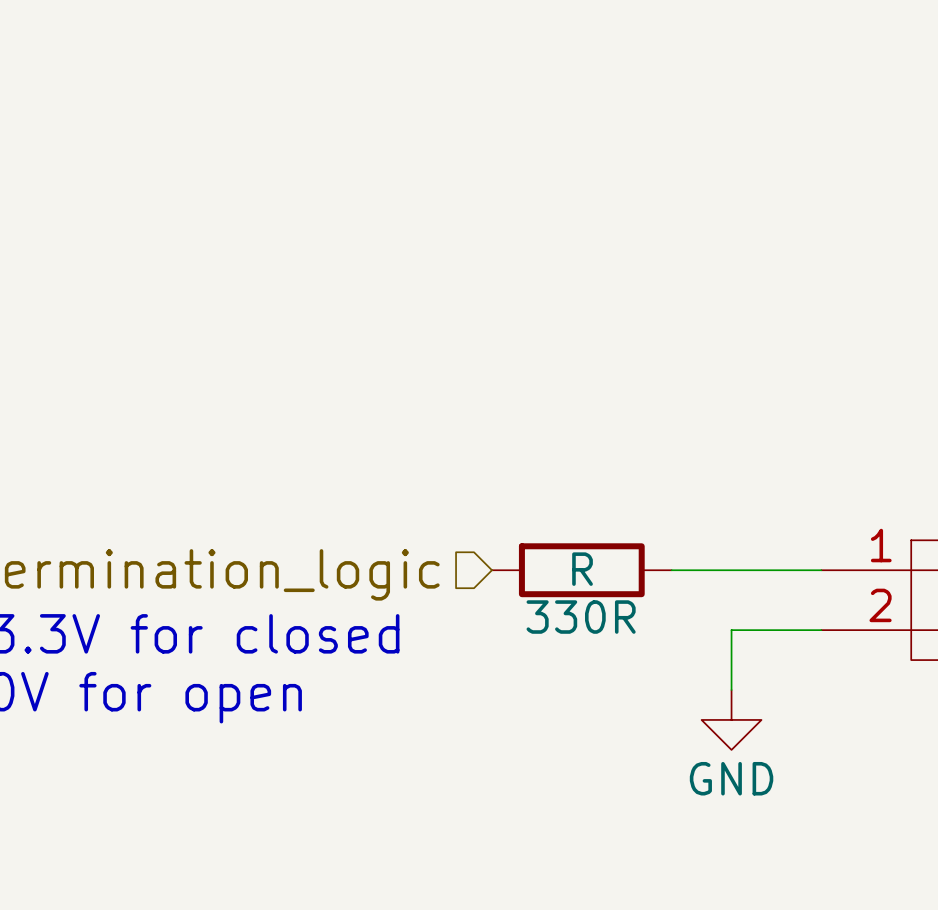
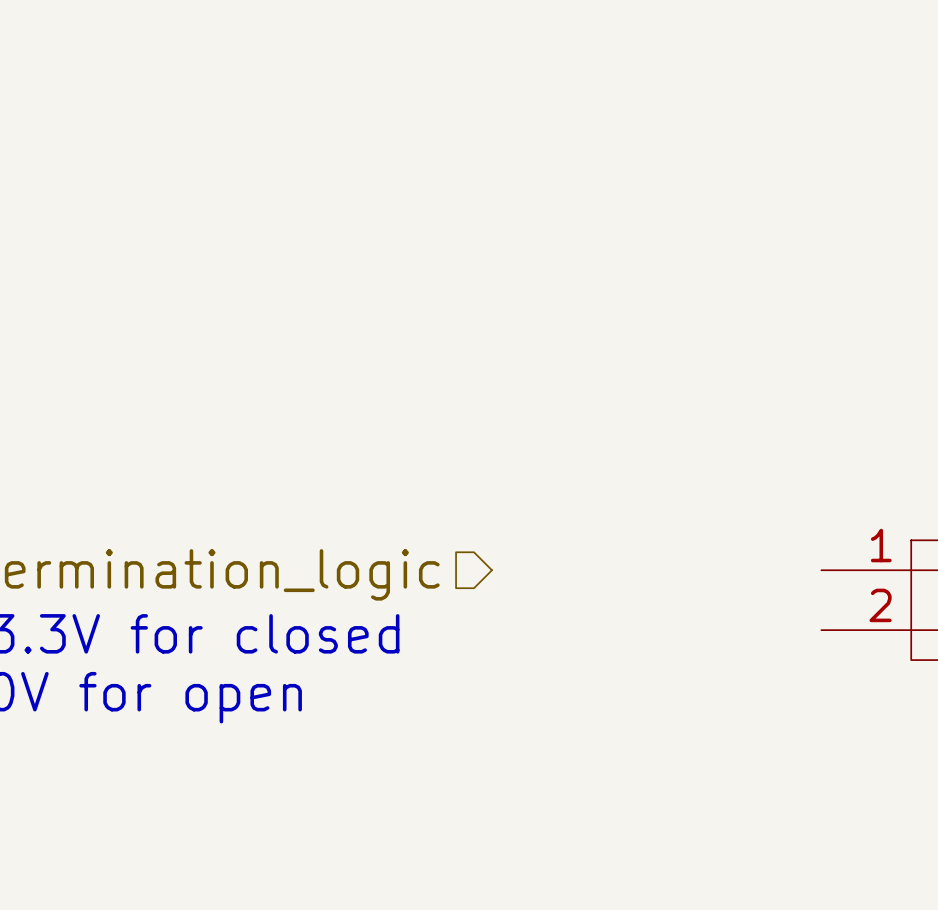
330R: R (581, 570) -> none
wire: (671, 570) (821, 570) -> none
wire: (821, 630) (731, 630) (731, 690) -> none
power symbol: GND (731, 719) -> none

